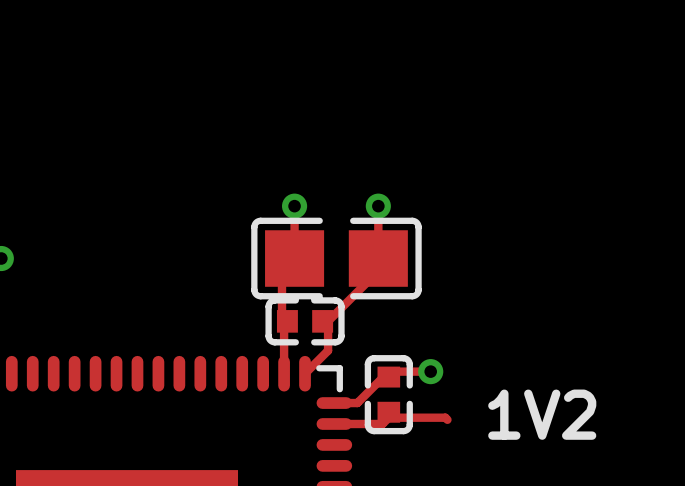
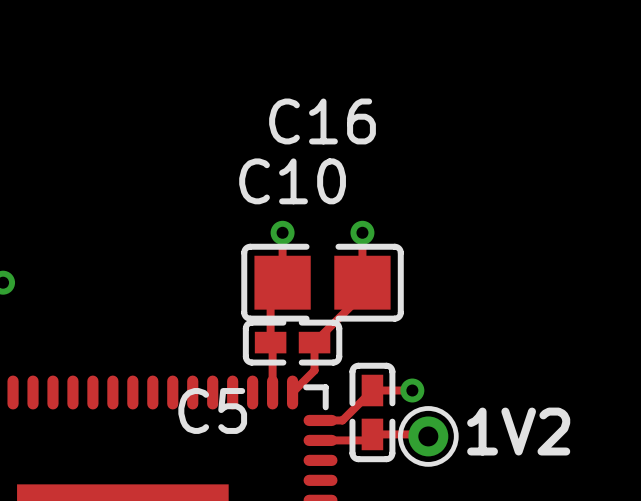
part: (336, 258) -> none
C16: none -> (322, 282)
part: (305, 321) -> none
C10: none -> (292, 342)
part: (388, 394) -> none
C5: none -> (372, 412)
part: none -> (428, 436)

